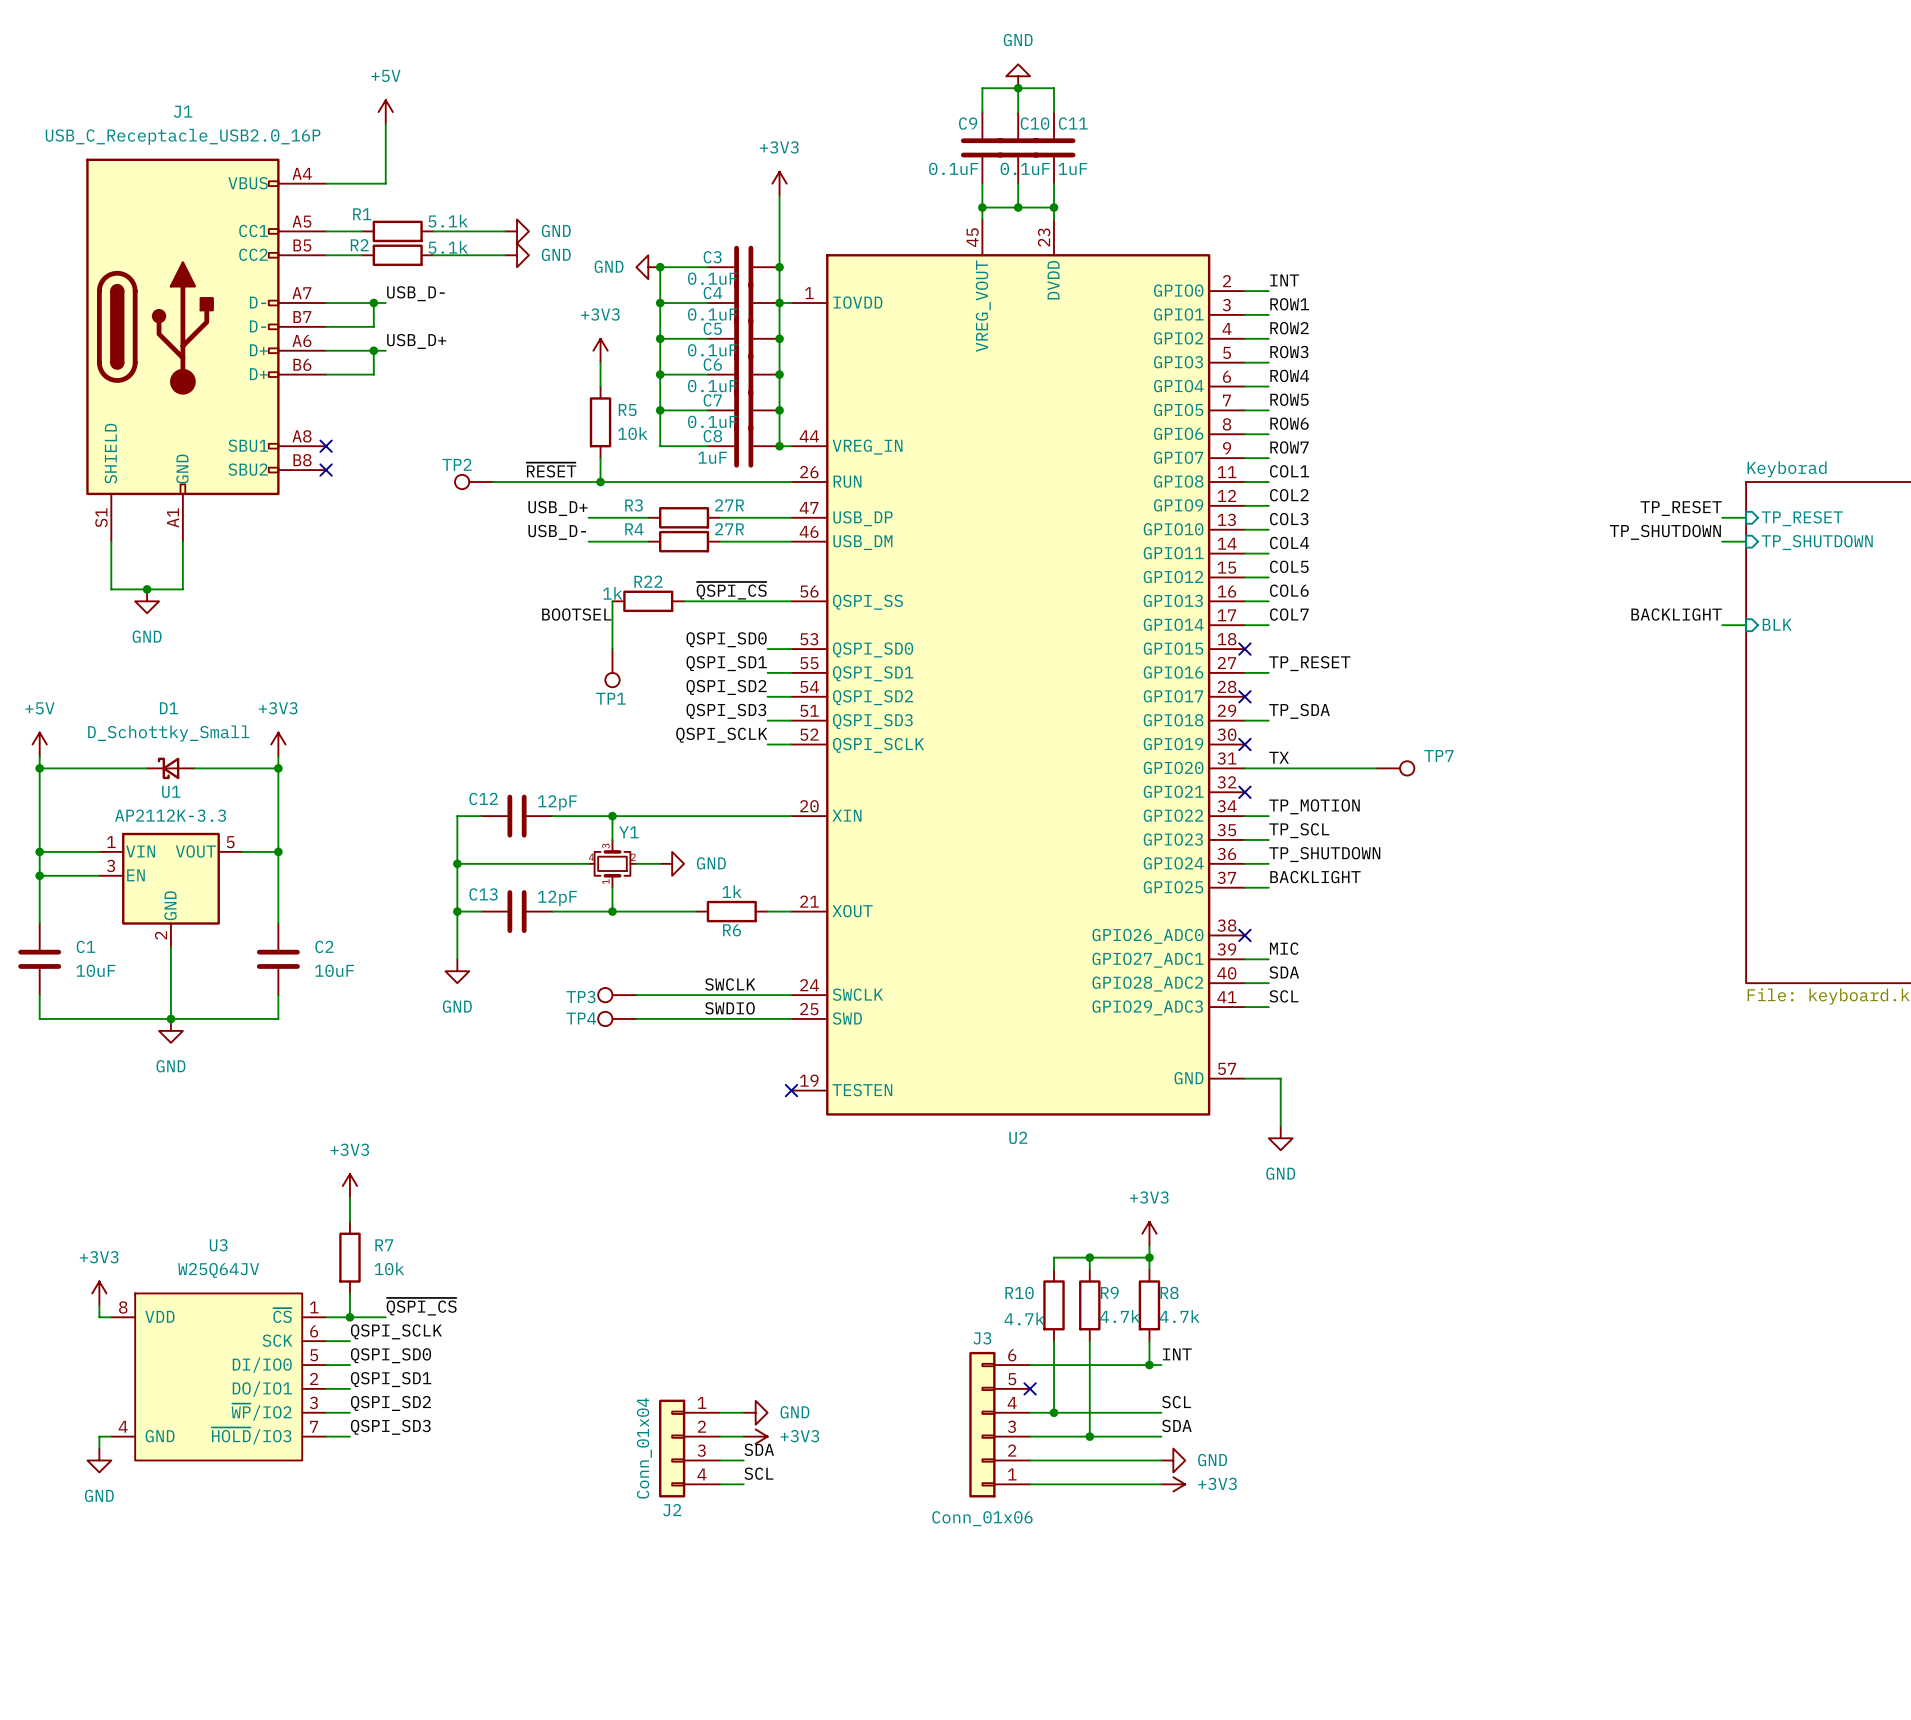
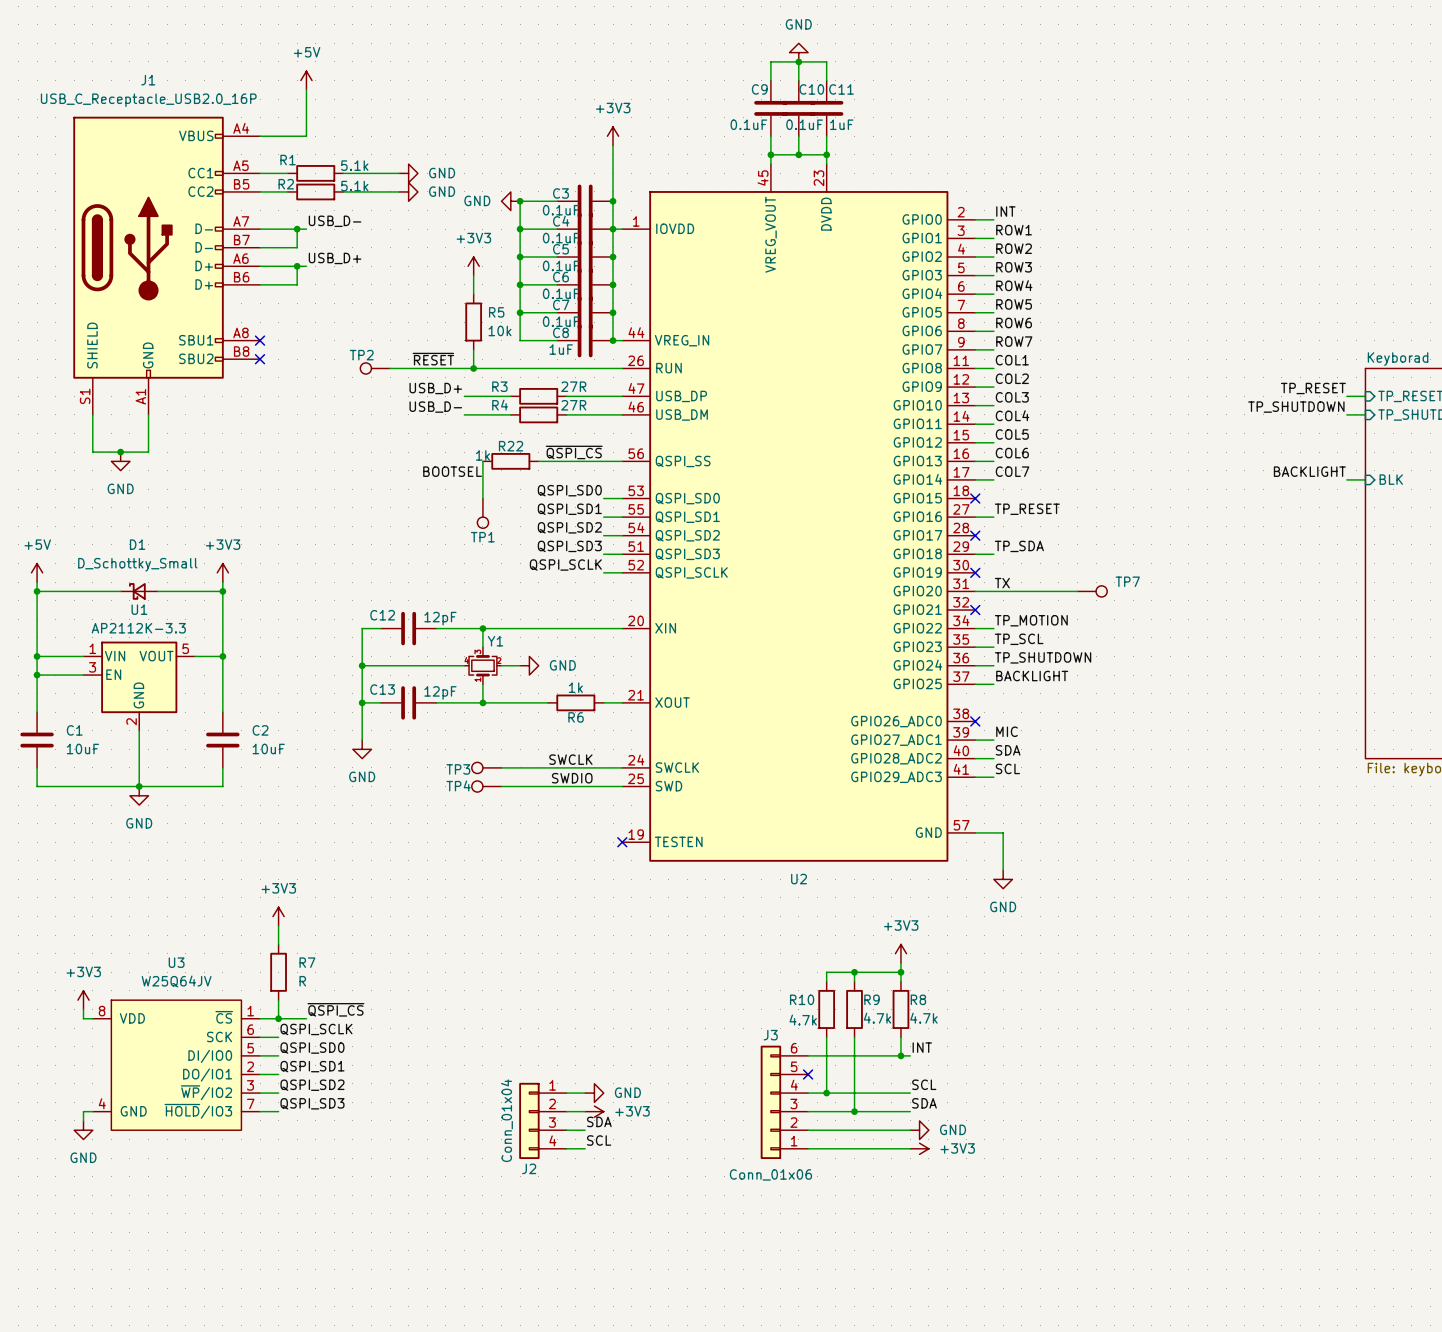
R7 value: 10k (389, 1268) -> R (302, 981)

